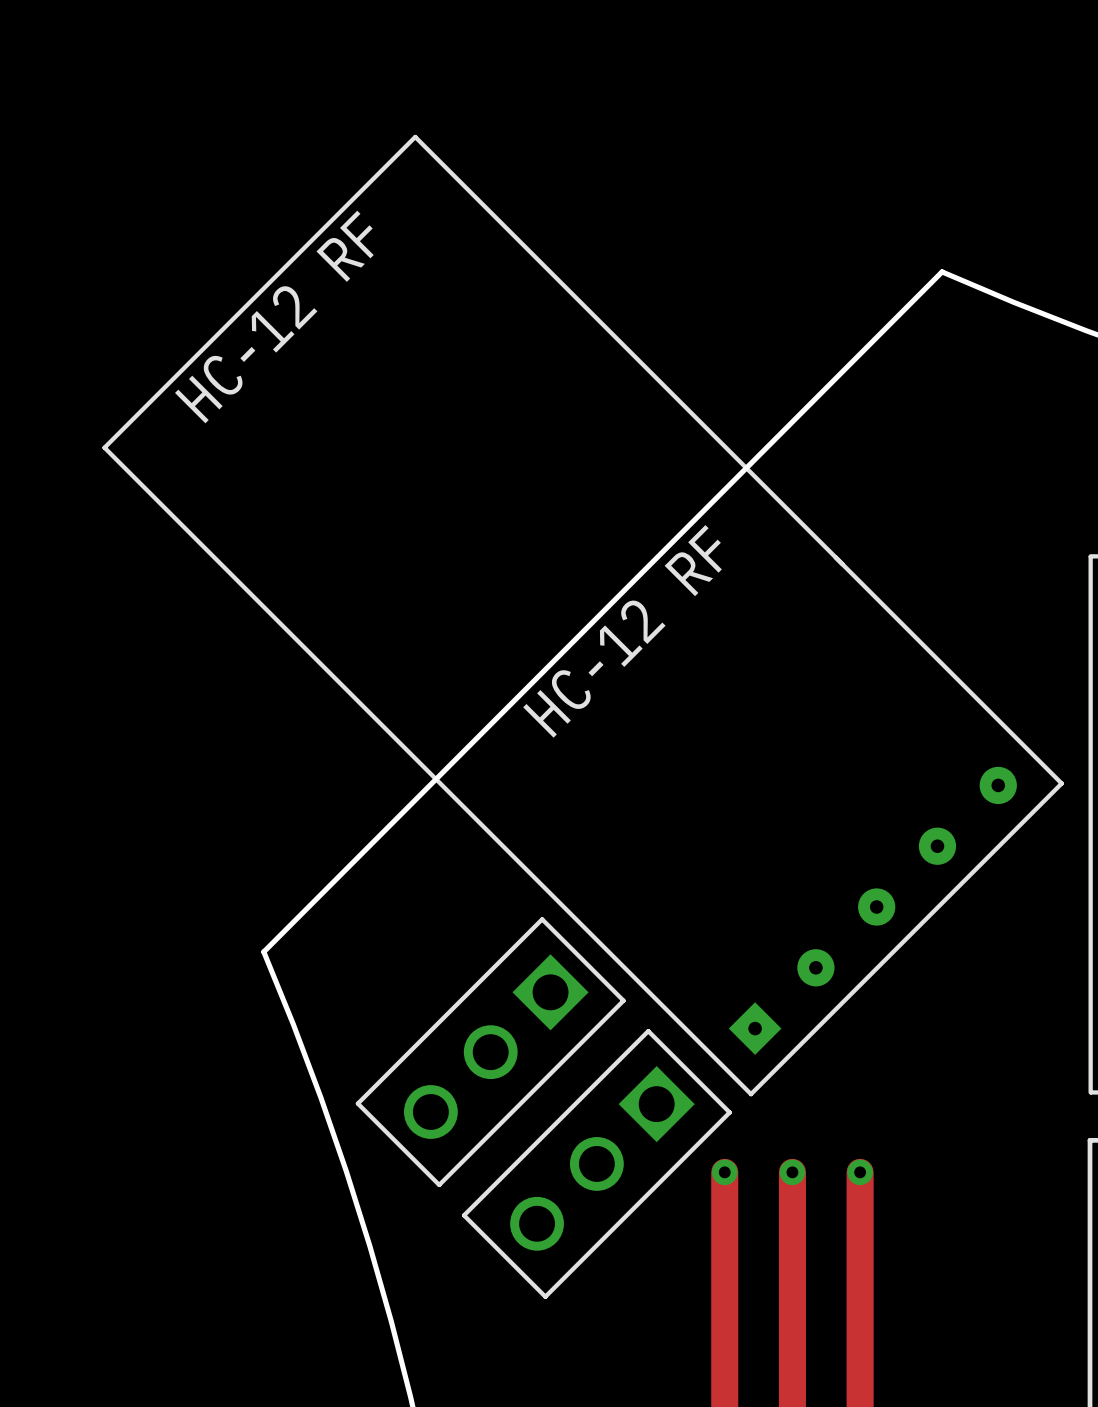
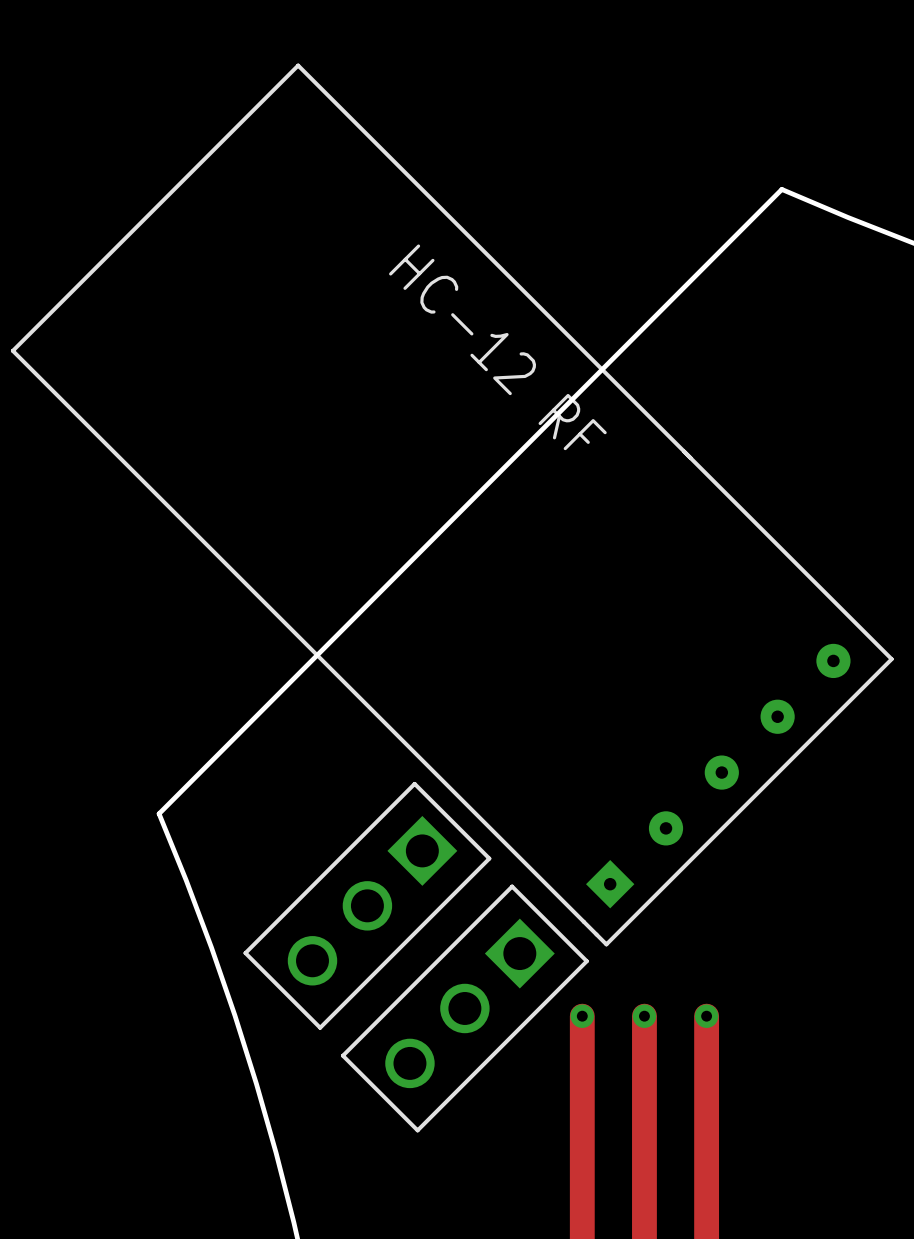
part footprint: [102, 134, 1064, 1097] -> [10, 63, 894, 947]
text: HC-12 RF (622, 631) -> none

